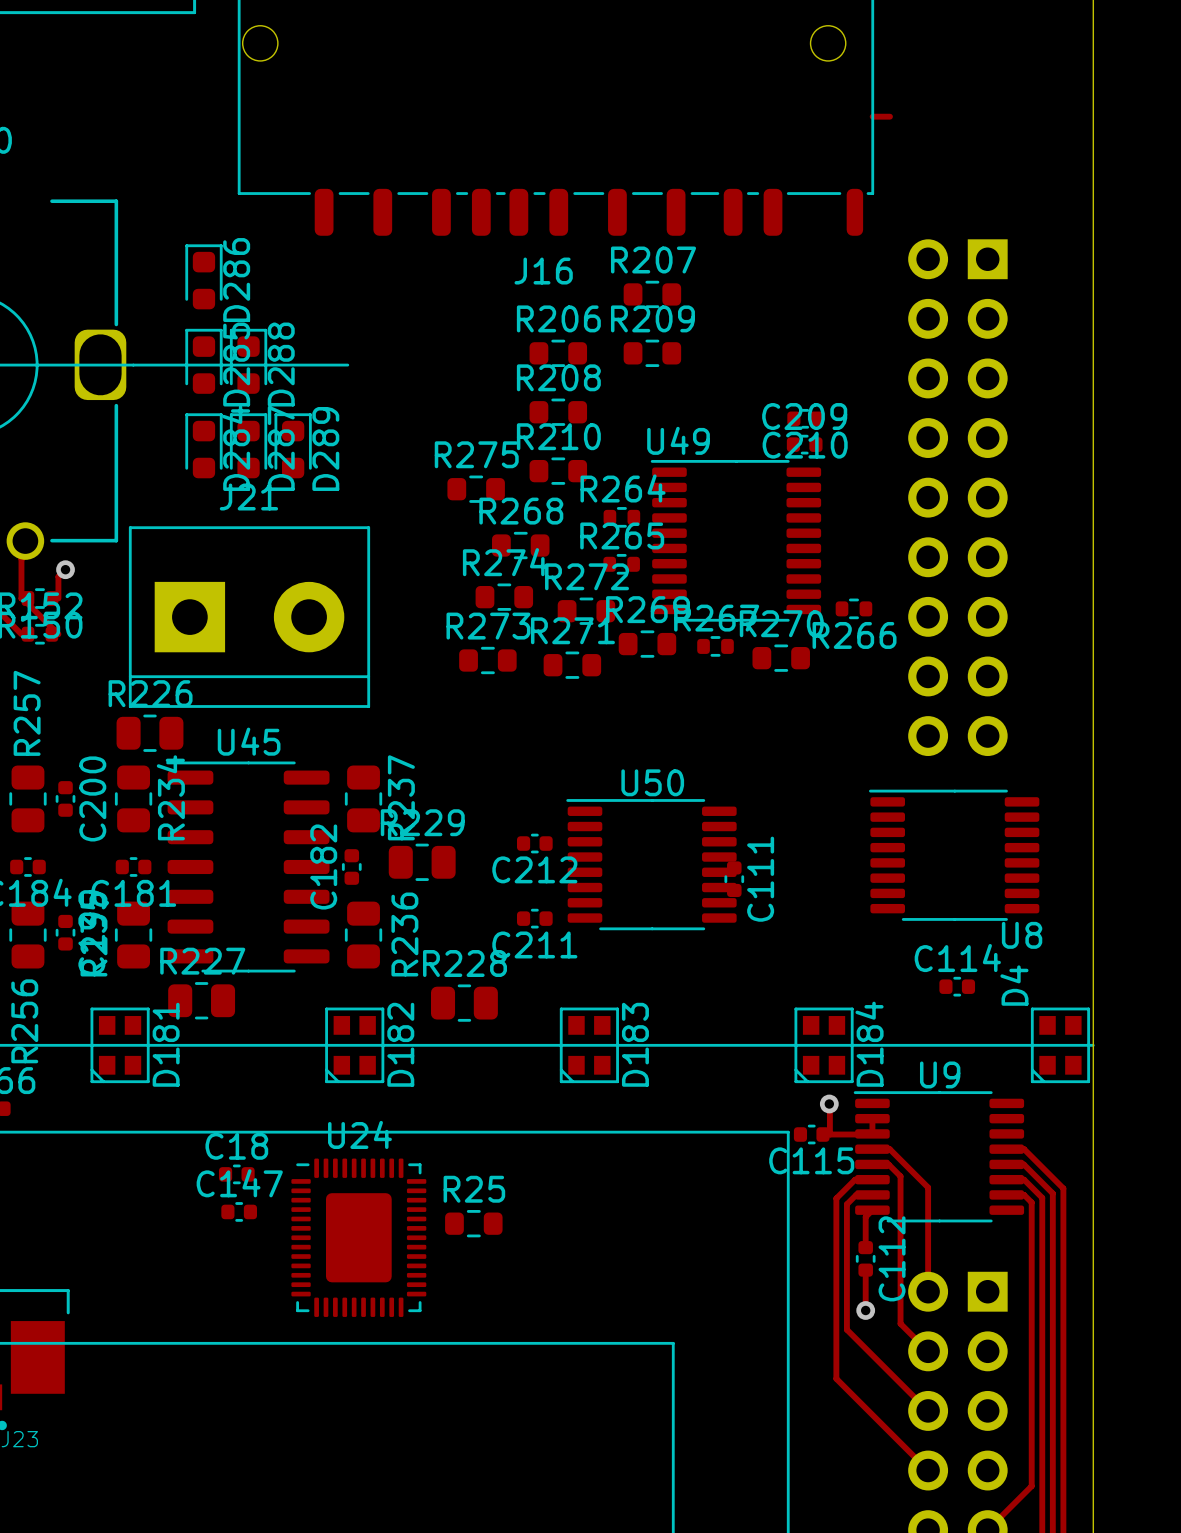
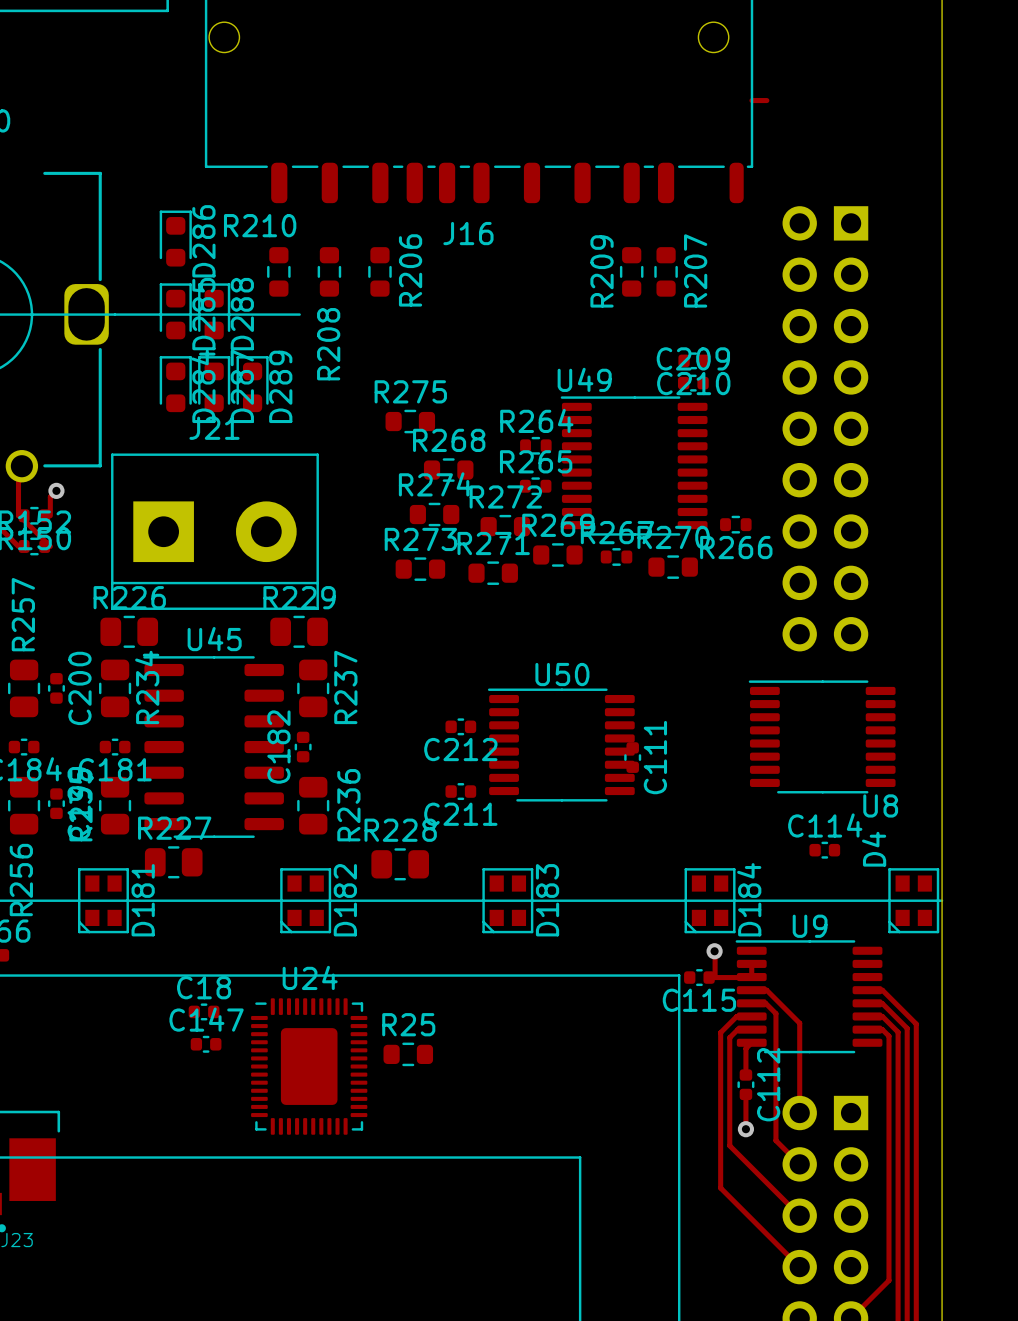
R207 rotation: 0° (652, 294) -> 90° clockwise (666, 271)
R207 position: (652, 294) -> (666, 271)
R209 name position: R209 (652, 318) -> R209 (602, 271)
R206 rotation: 0° (558, 353) -> 90° clockwise (379, 271)
R206 position: (558, 353) -> (379, 271)
R209 rotation: 0° (652, 353) -> 90° clockwise (631, 271)
R209 position: (652, 353) -> (631, 271)
R208 name position: R208 (558, 377) -> R208 (328, 344)
R208 rotation: 0° (558, 412) -> 90° clockwise (329, 271)
R208 position: (558, 412) -> (329, 271)
R210 rotation: 0° (558, 471) -> 90° clockwise (278, 271)
R210 position: (558, 471) -> (278, 271)
R229 position: (422, 862) -> (299, 631)

